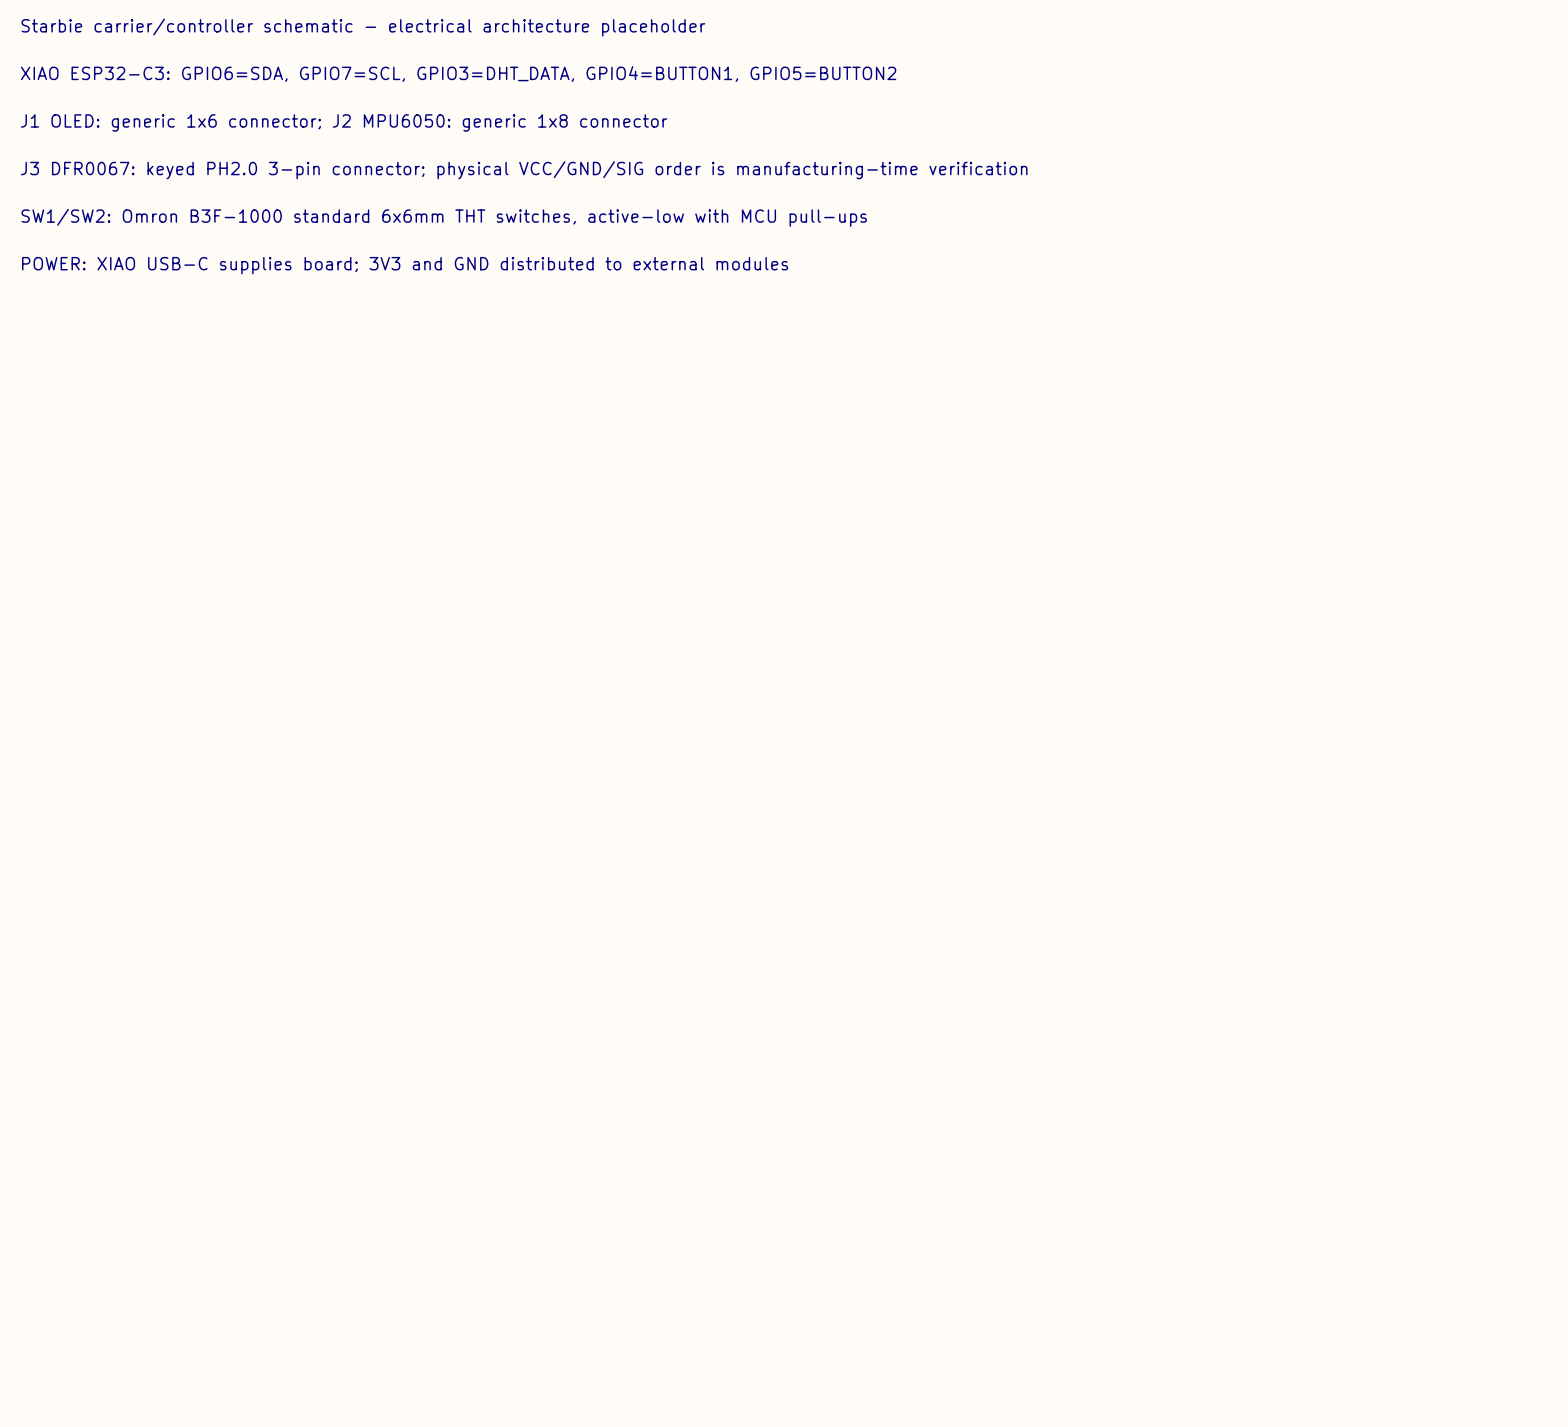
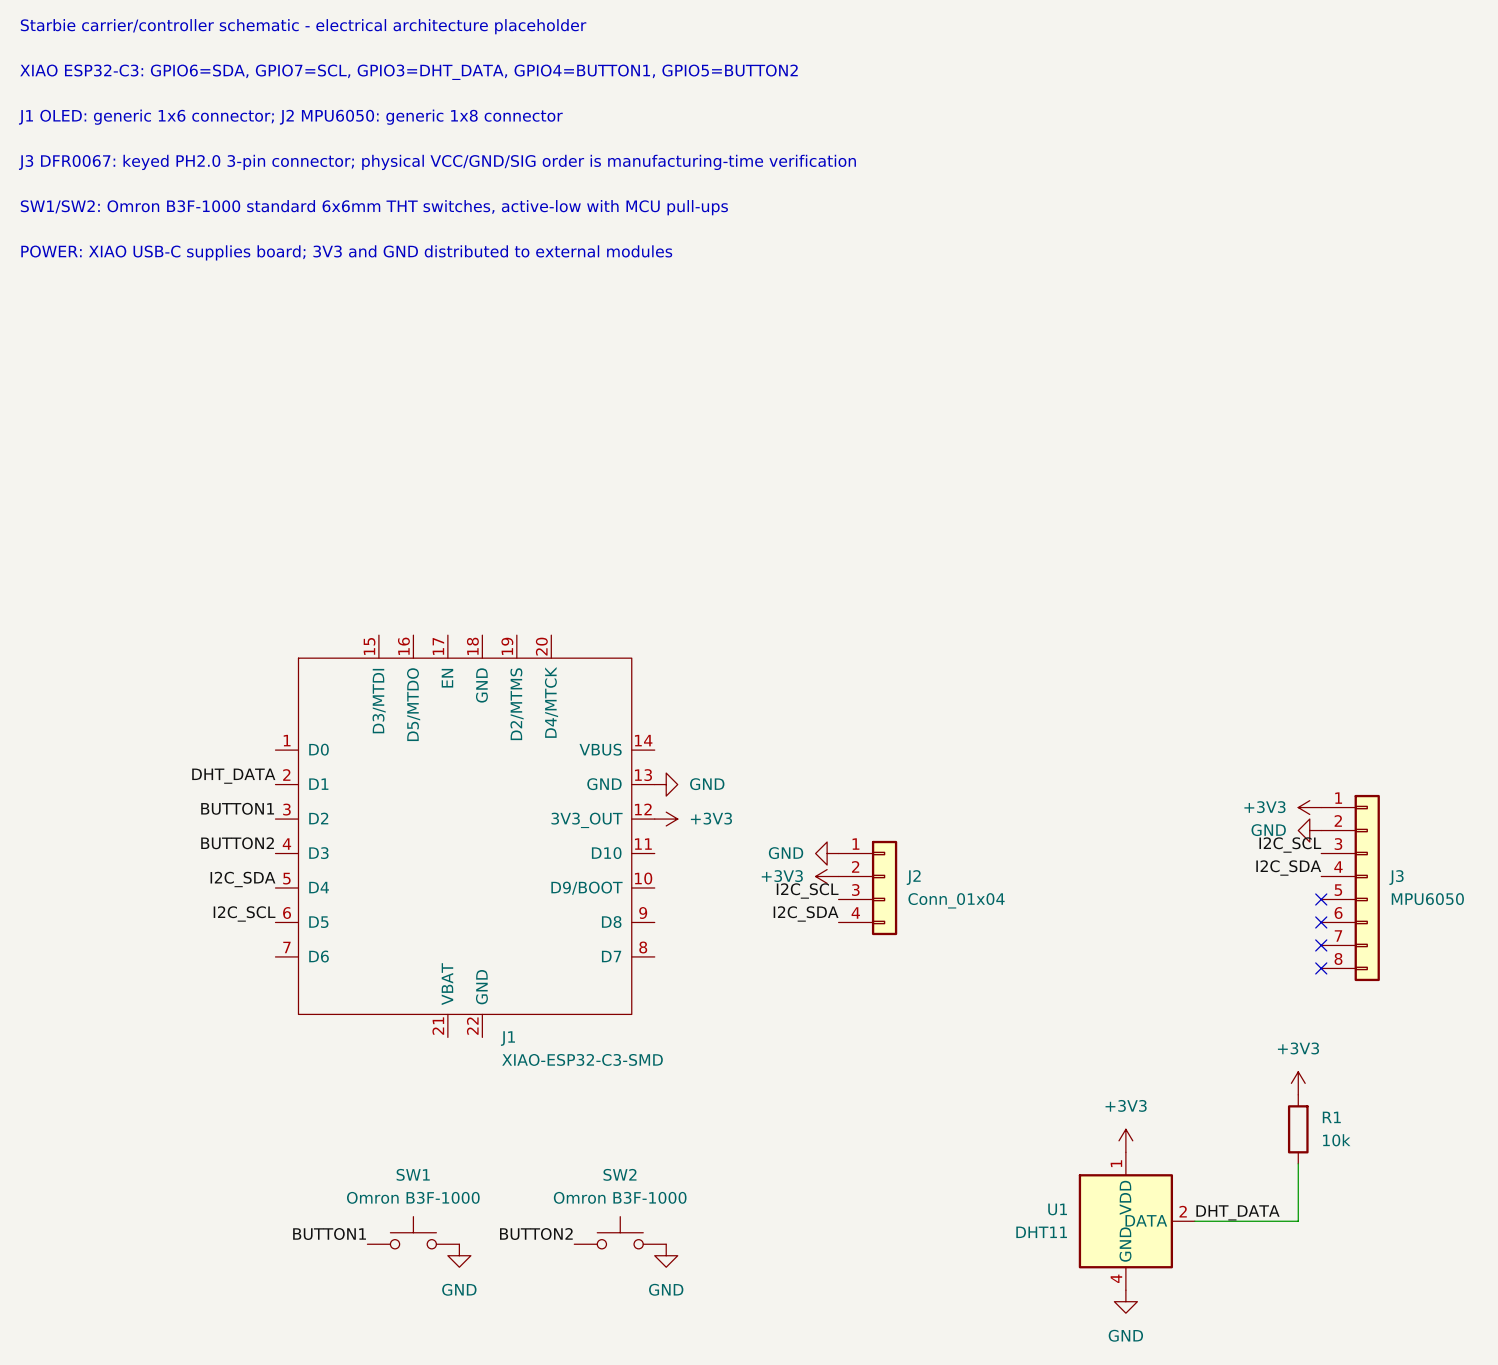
label: none -> DHT_DATA (233, 776)
power symbol: none -> GND (666, 784)
power symbol: none -> +3V3 (1309, 807)
label: none -> BUTTON1 (237, 808)
power symbol: none -> +3V3 (666, 819)
power symbol: none -> GND (1309, 830)
J1: none -> XIAO-ESP32-C3-SMD (465, 836)
label: none -> BUTTON2 (237, 843)
label: none -> I2C_SCL (1290, 845)
power symbol: none -> GND (827, 853)
label: none -> I2C_SDA (1288, 868)
power symbol: none -> +3V3 (827, 876)
label: none -> I2C_SDA (242, 879)
J2: none -> Conn_01x04 (867, 888)
J3: none -> MPU6050 (1350, 888)
label: none -> I2C_SCL (807, 890)
no-connect mark: none -> (1321, 899)
label: none -> I2C_SCL (244, 913)
label: none -> I2C_SDA (806, 913)
no-connect mark: none -> (1321, 922)
no-connect mark: none -> (1321, 945)
no-connect mark: none -> (1321, 968)
power symbol: none -> +3V3 (1298, 1083)
R1: none -> 10k (1298, 1129)
power symbol: none -> +3V3 (1125, 1140)
wire: none -> (1298, 1163) (1298, 1221) (1194, 1221)
label: none -> DHT_DATA (1237, 1212)
U1: none -> DHT11 (1136, 1221)
SW1: none -> Omron B3F-1000 (413, 1232)
SW2: none -> Omron B3F-1000 (620, 1232)
label: none -> BUTTON1 (329, 1234)
label: none -> BUTTON2 (536, 1234)
power symbol: none -> GND (459, 1255)
power symbol: none -> GND (666, 1255)
power symbol: none -> GND (1125, 1301)

